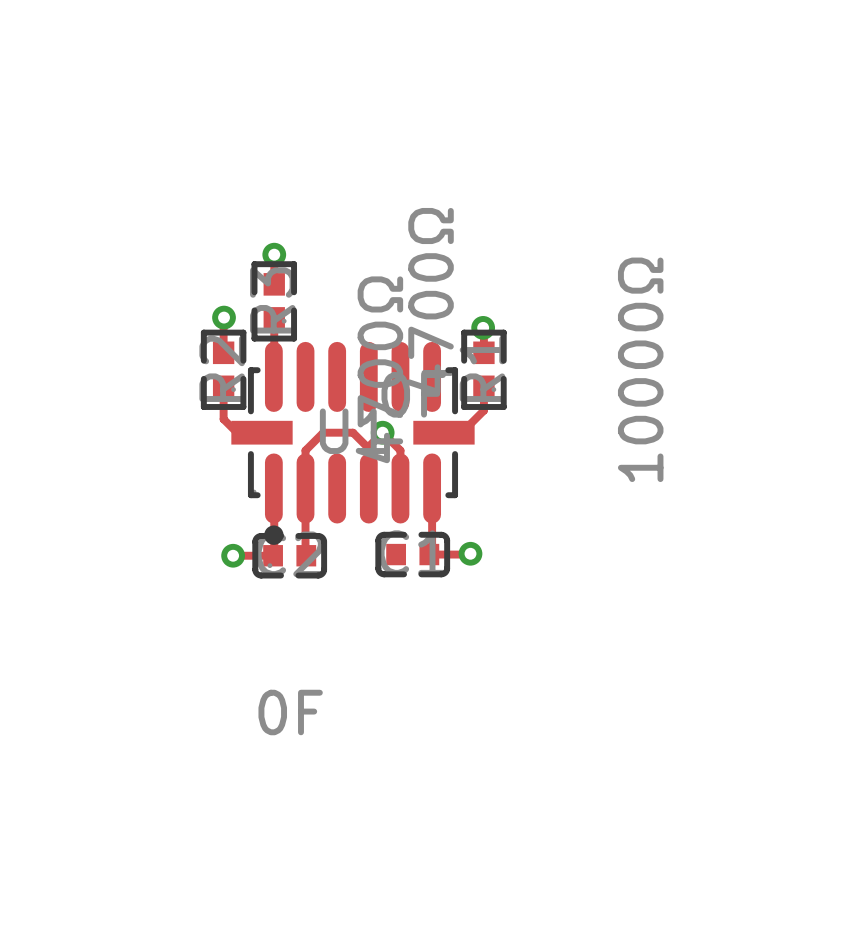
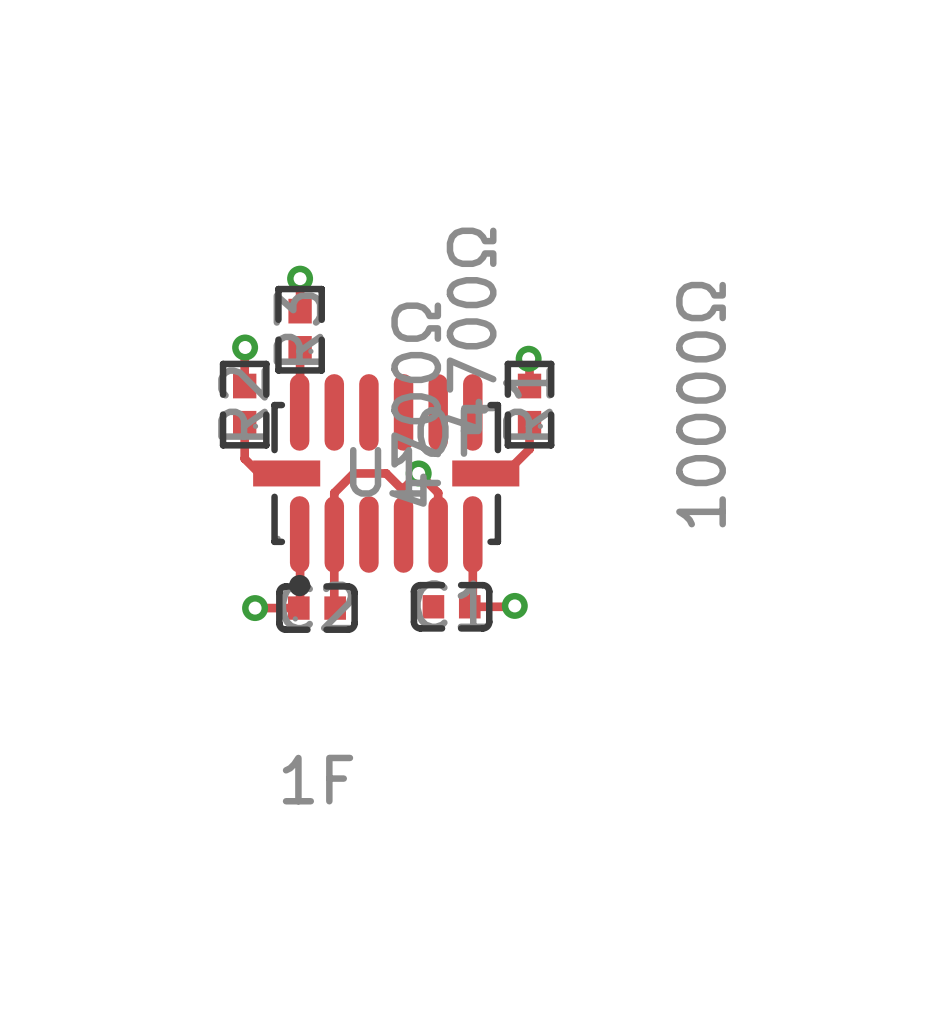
part value: 0F (290, 712) -> 1F (318, 779)

